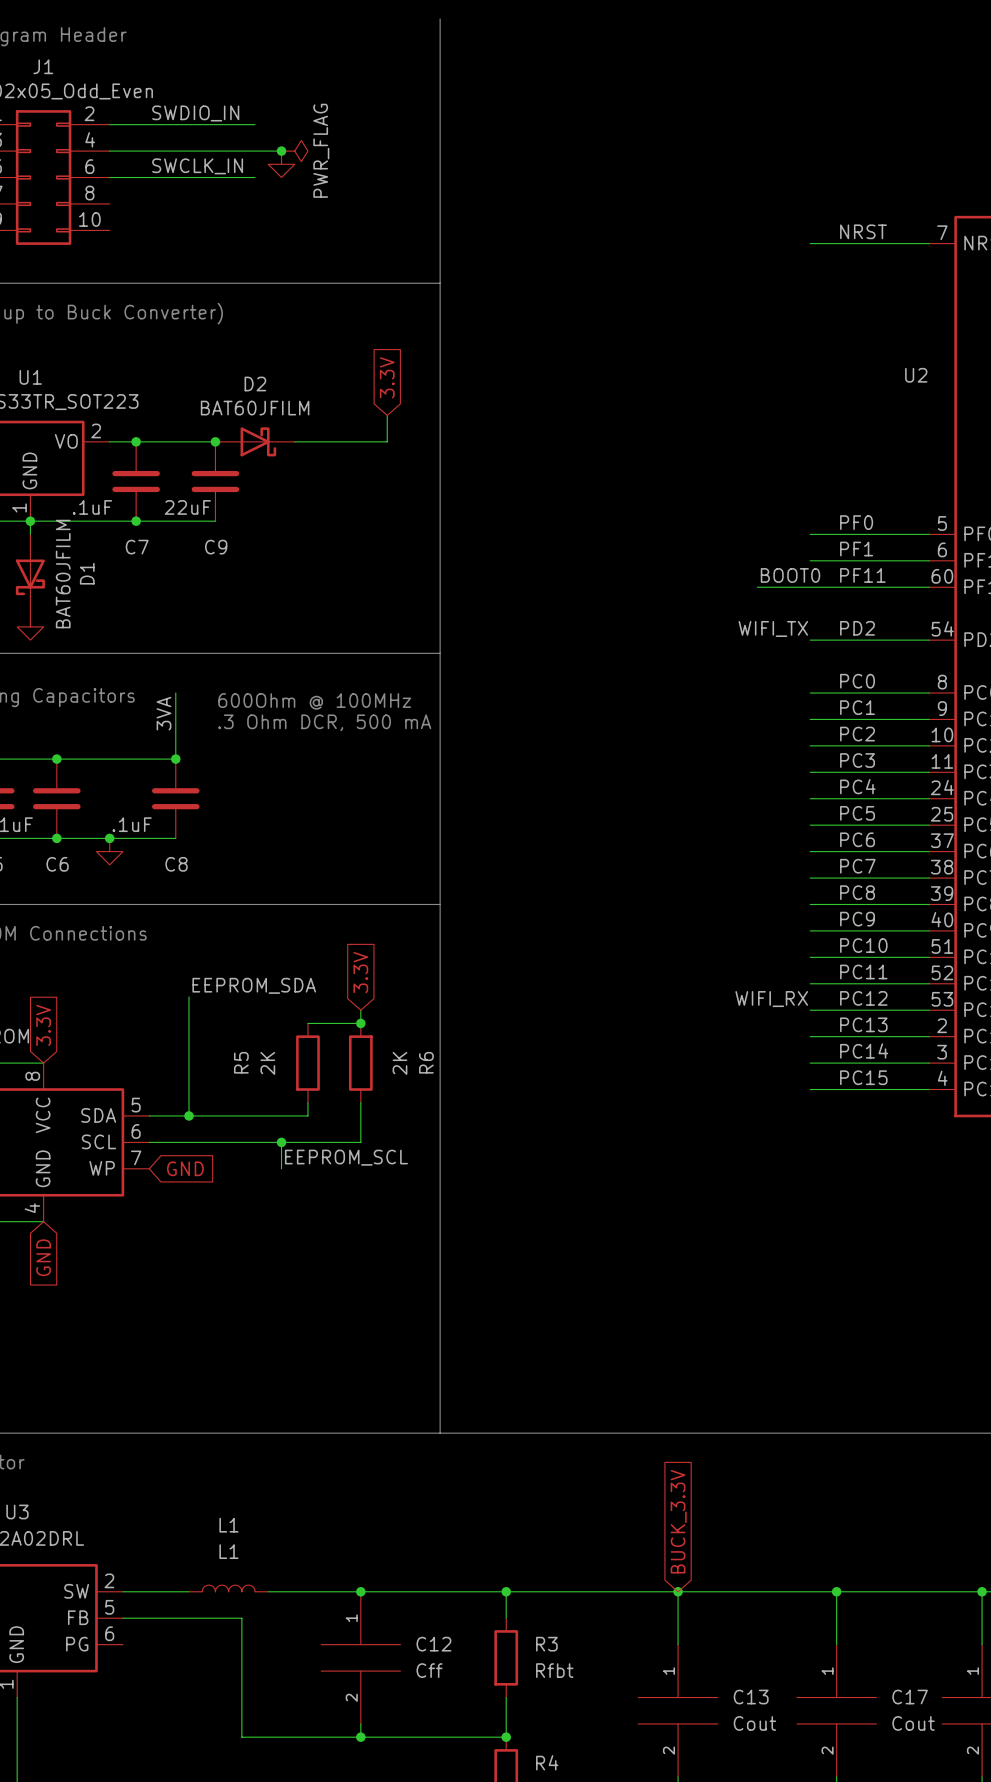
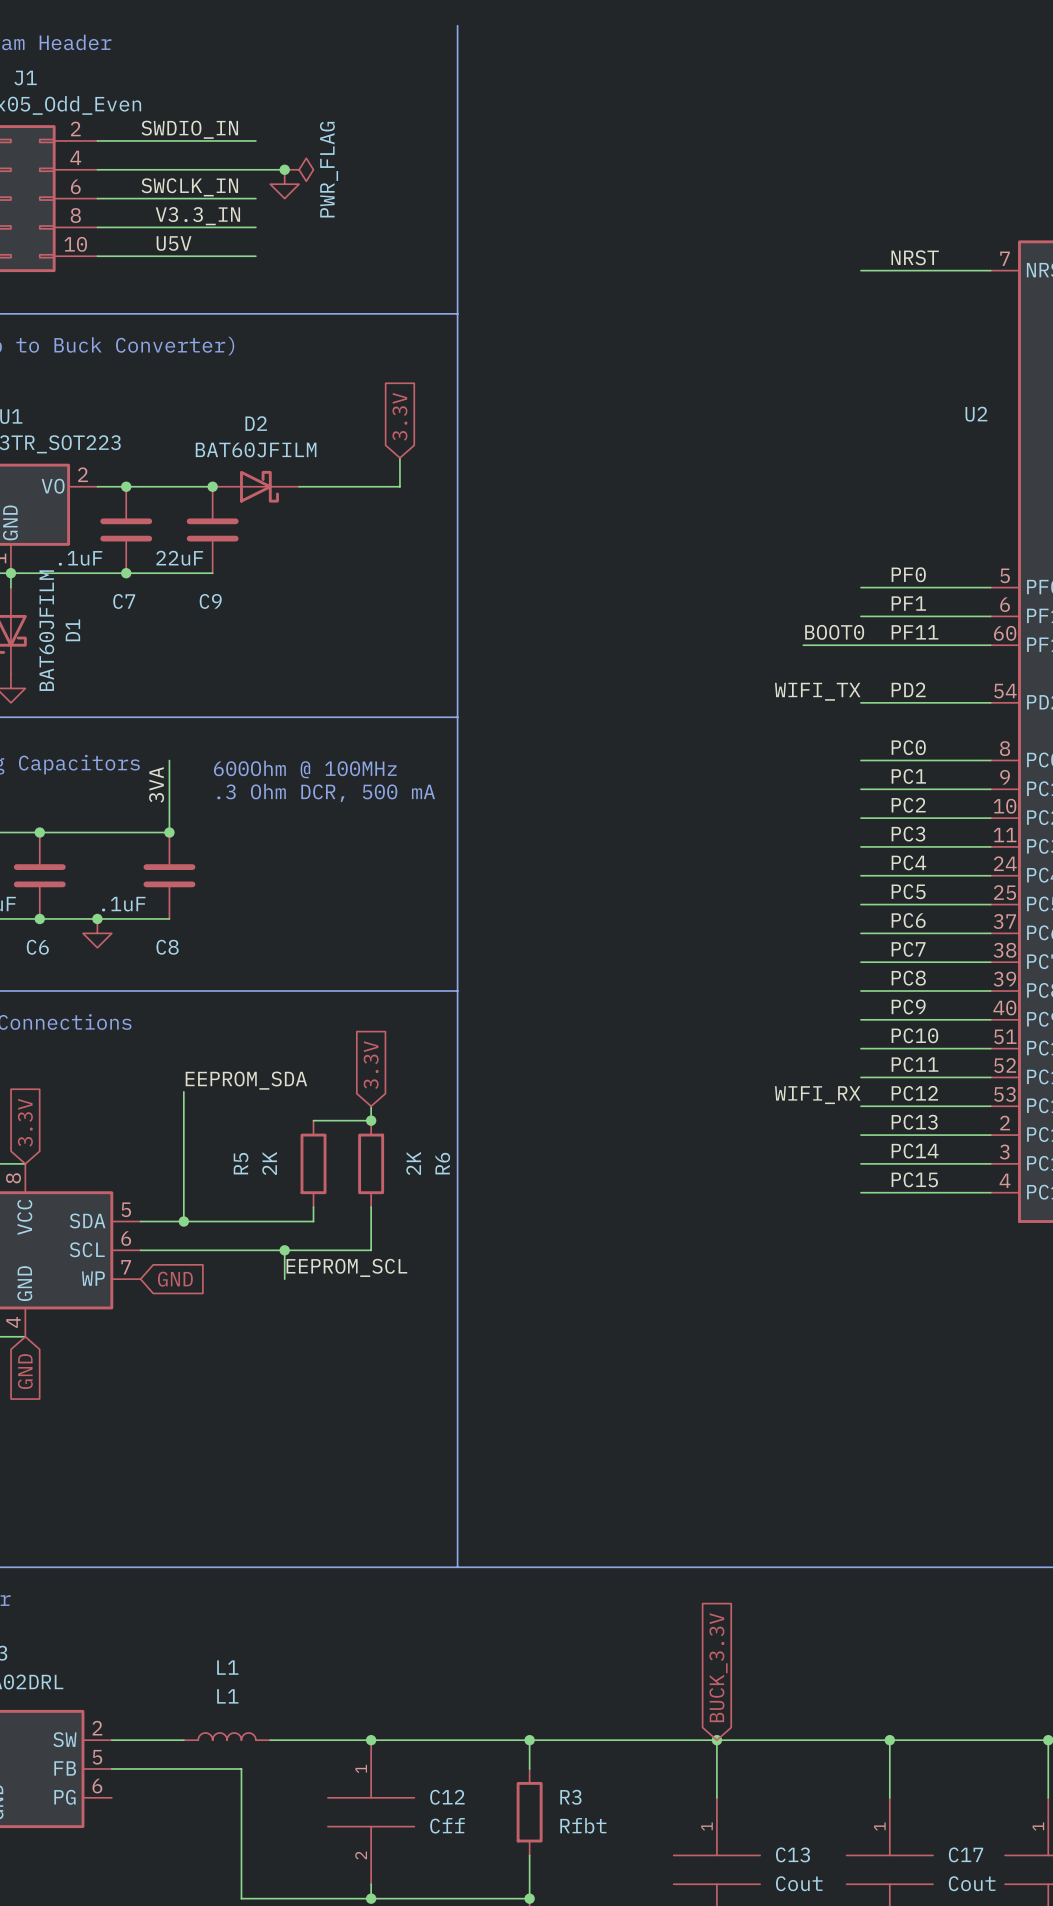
label: none -> V3.3_IN (197, 216)
wire: none -> (97, 227) (255, 227)
label: none -> U5V (174, 243)
wire: none -> (97, 256) (255, 256)

